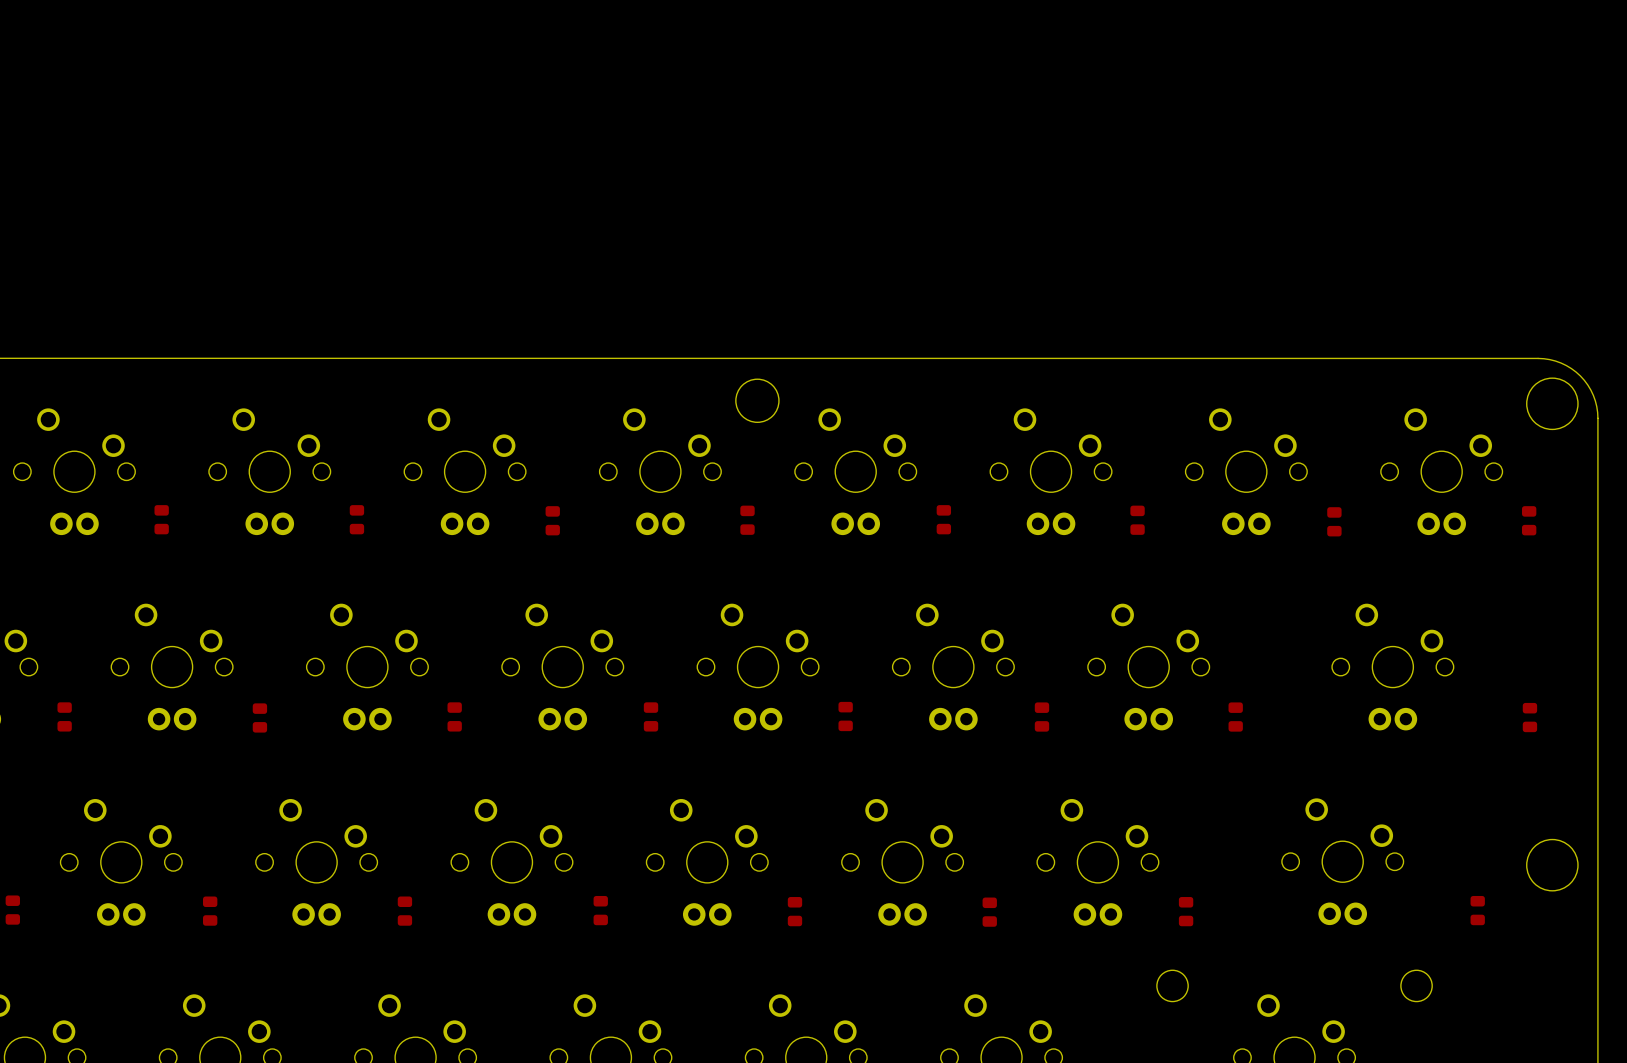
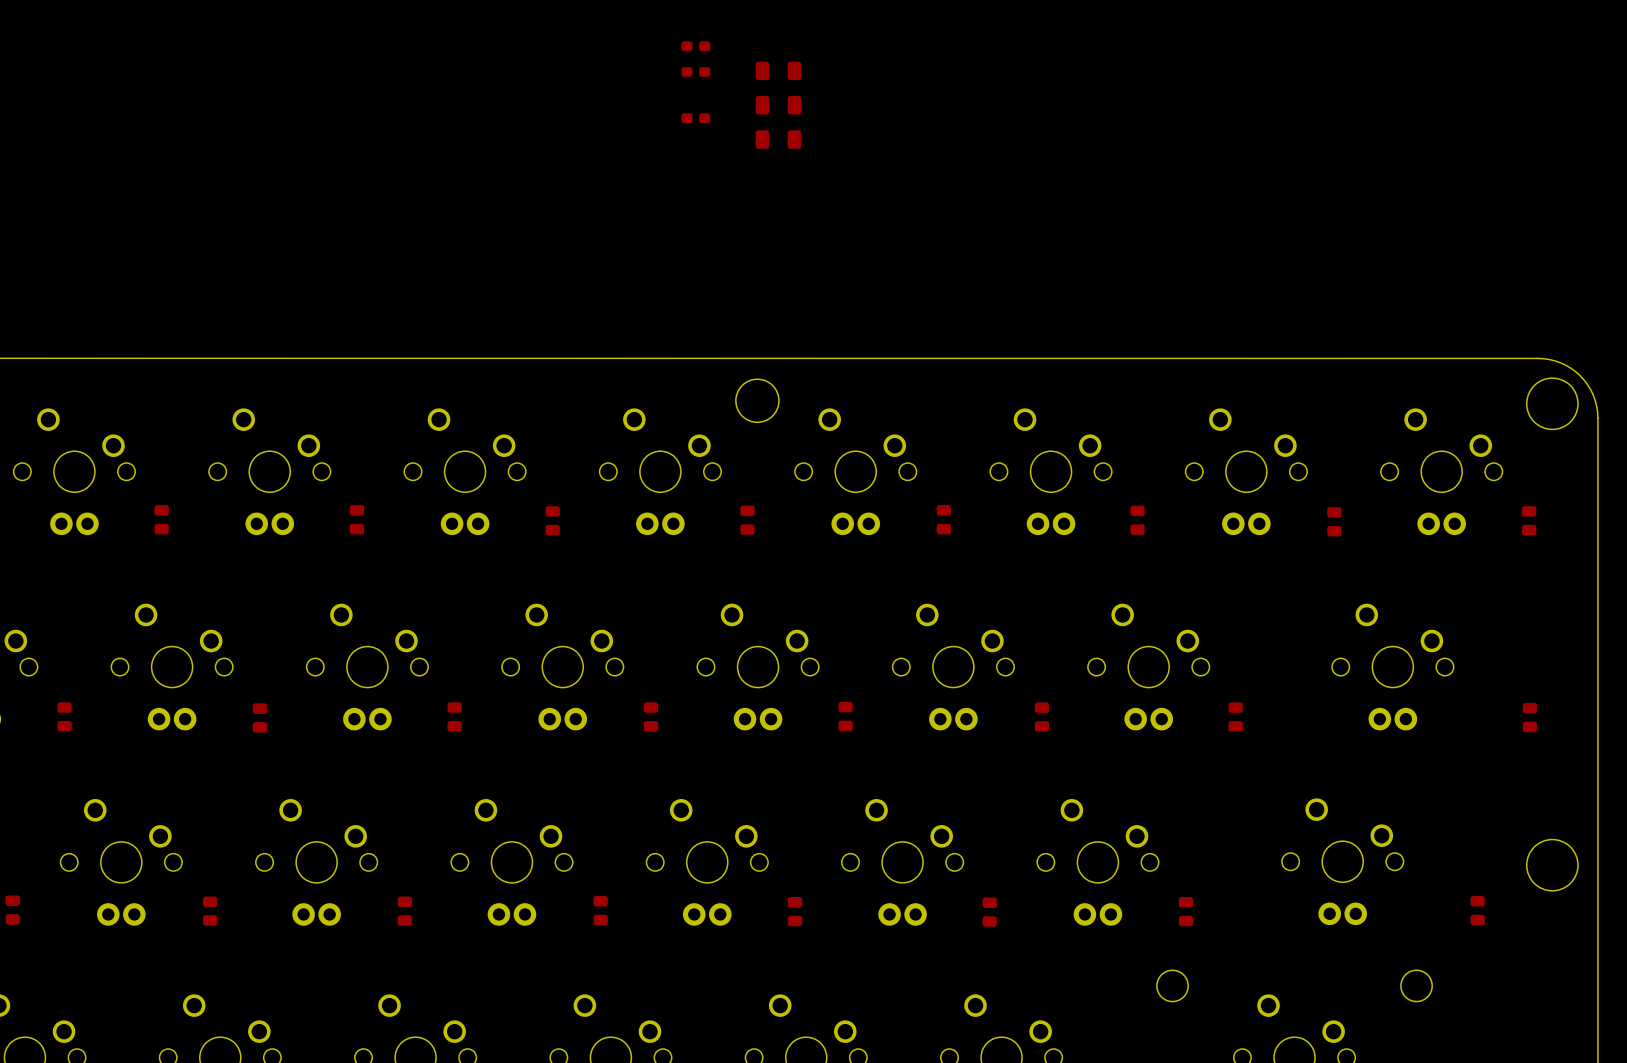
part: none -> (695, 46)
part: none -> (778, 70)
part: none -> (695, 71)
part: none -> (778, 105)
part: none -> (695, 118)
part: none -> (778, 139)

